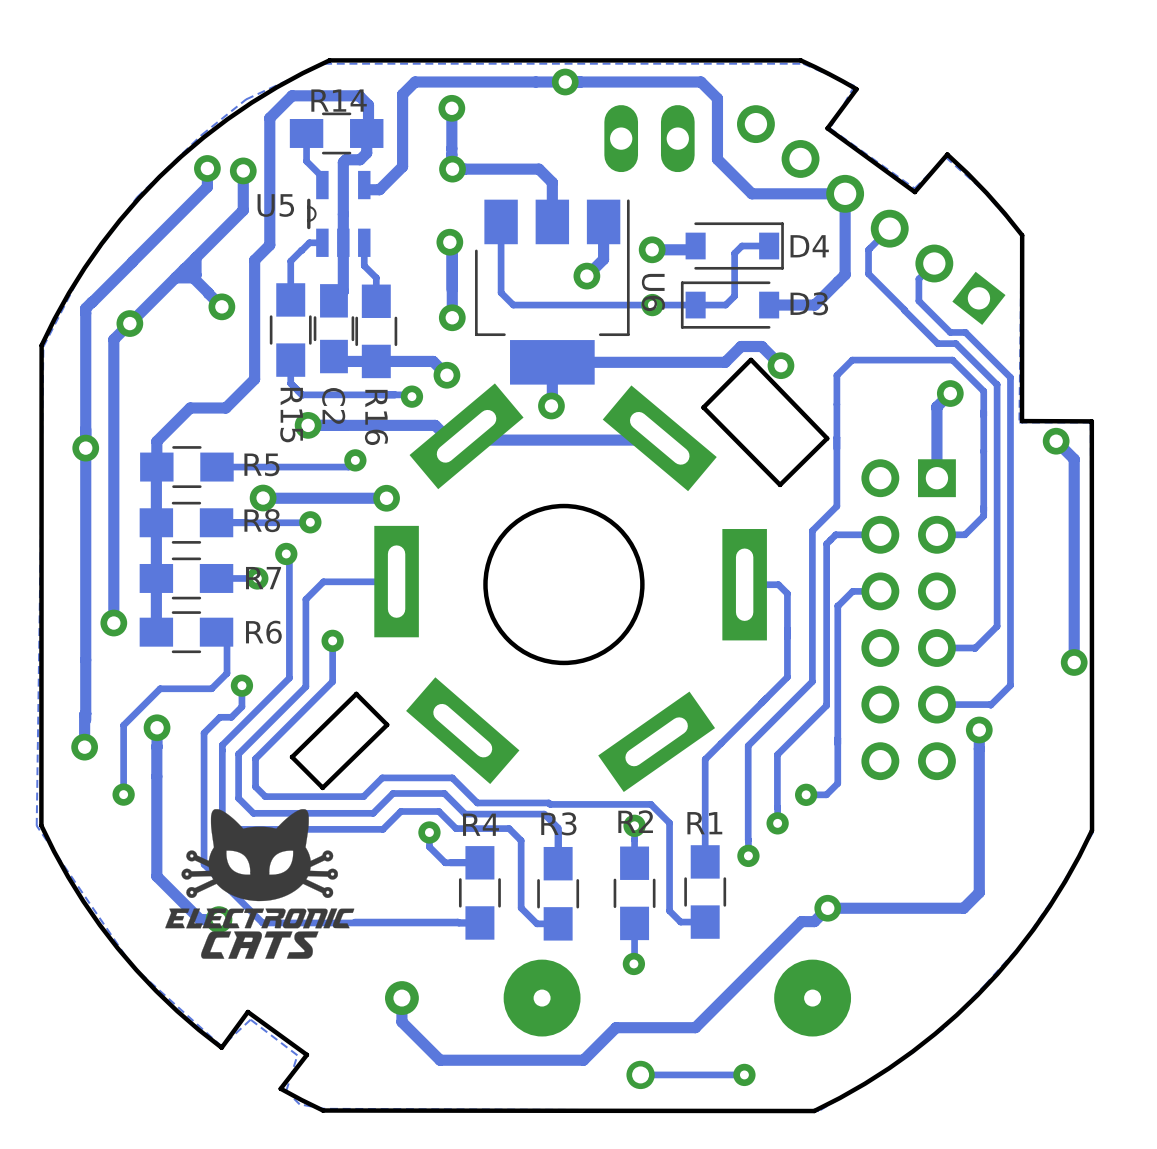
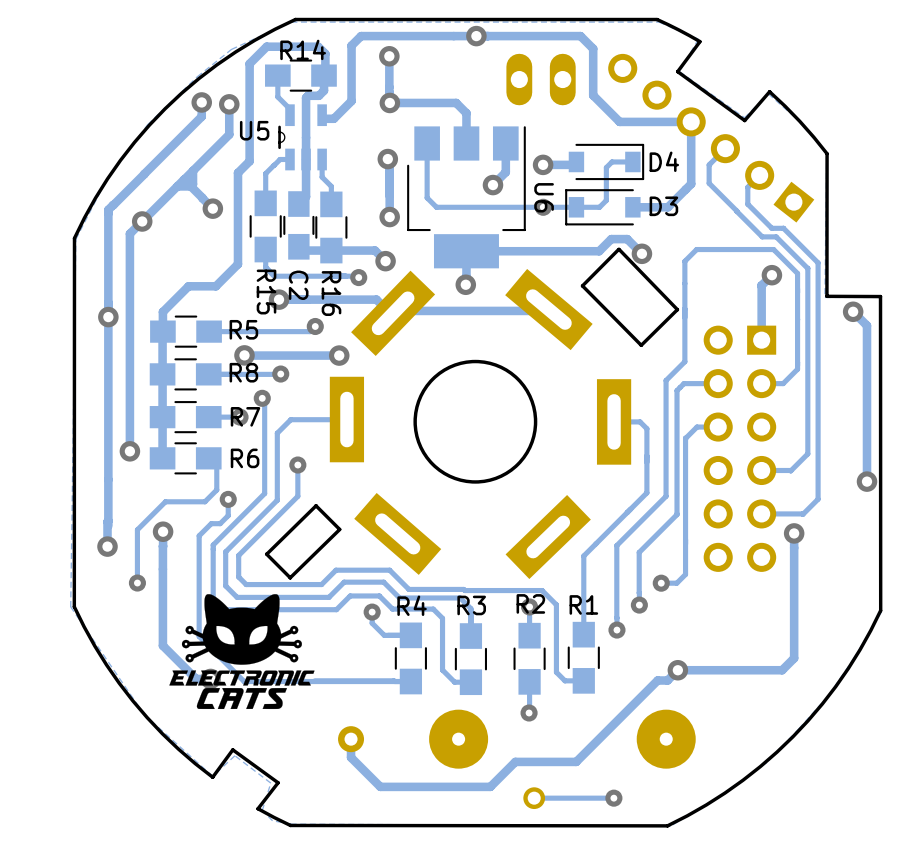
part rotation: 0° (466, 436) -> 6° counterclockwise (393, 313)
part rotation: 0° (656, 741) -> 9° counterclockwise (548, 537)

